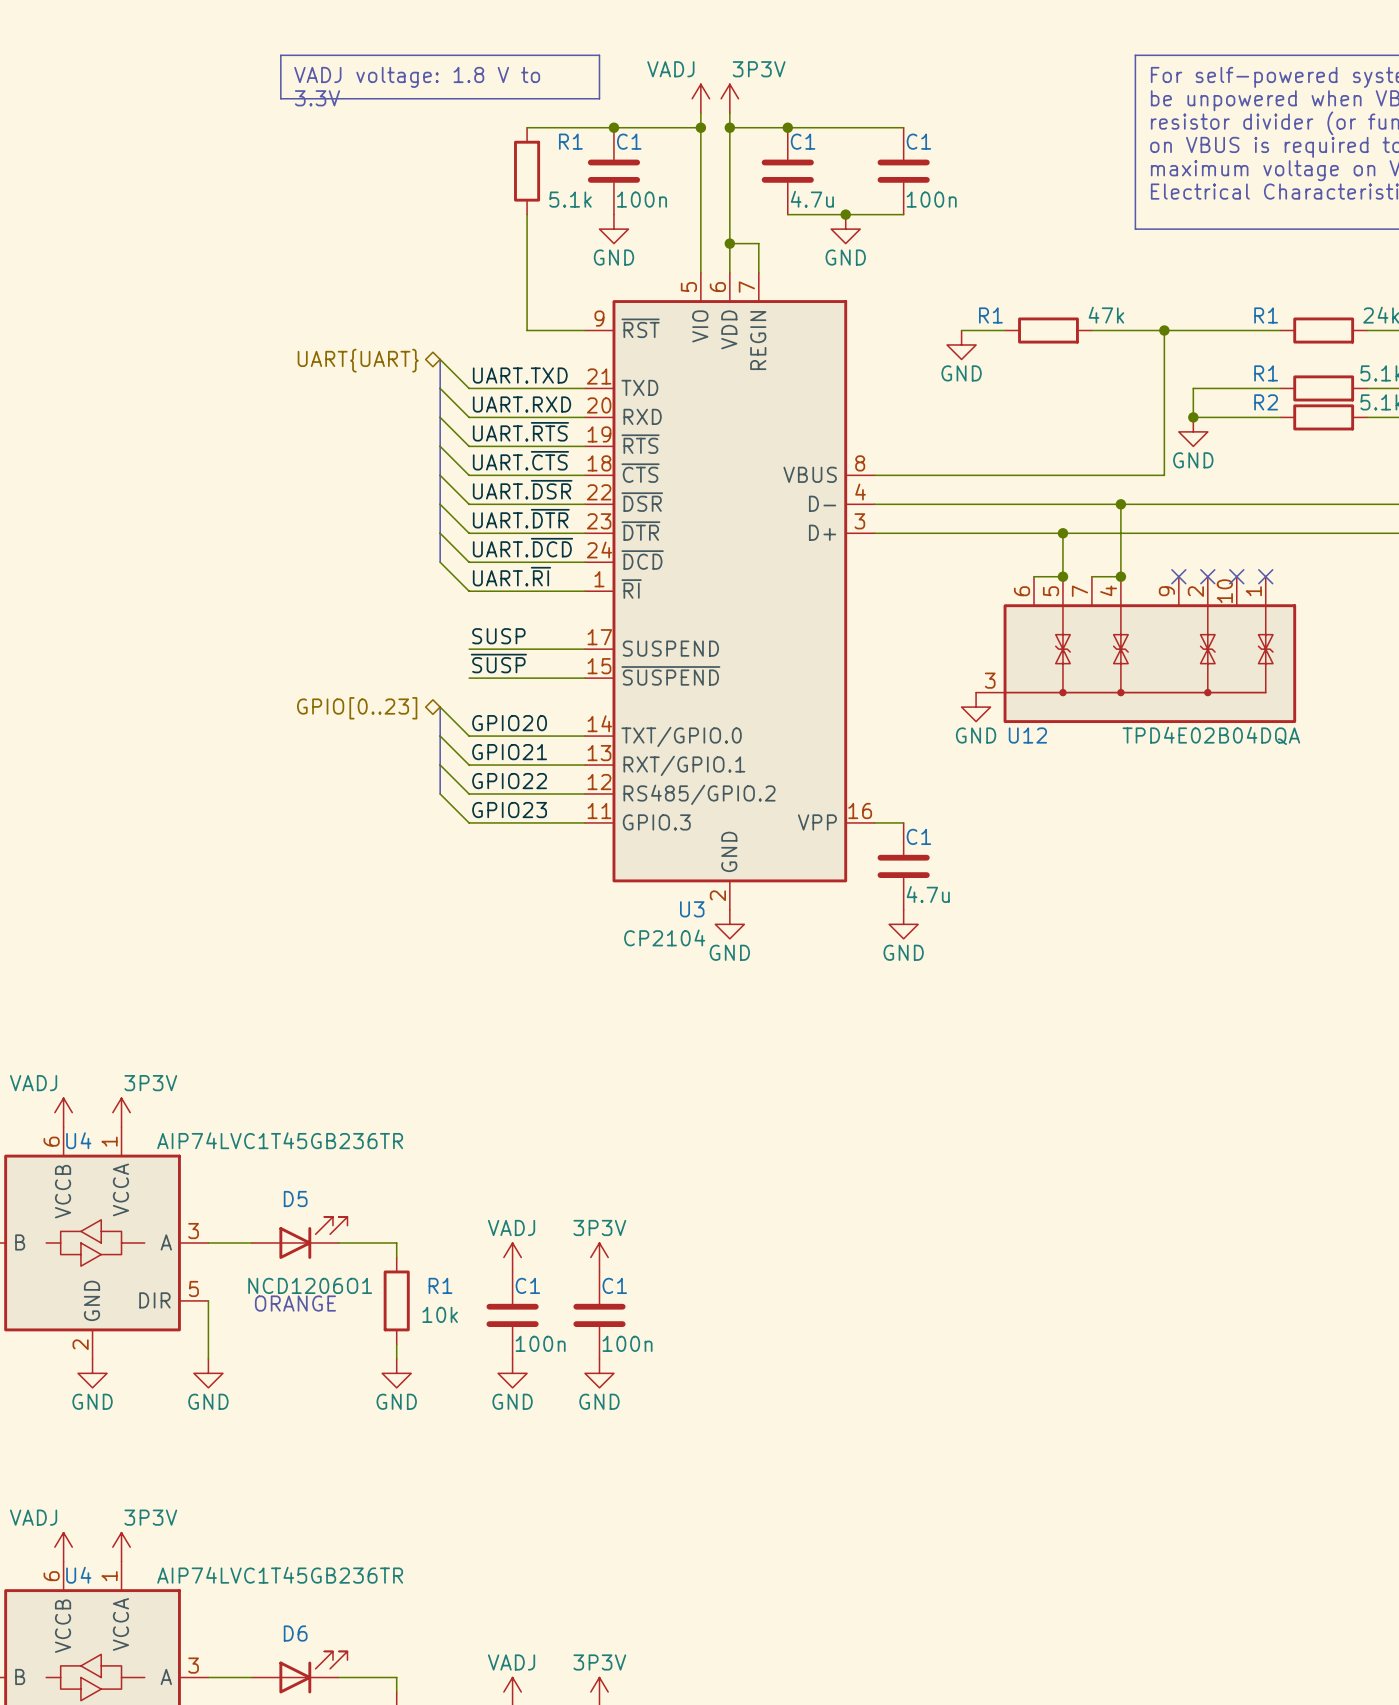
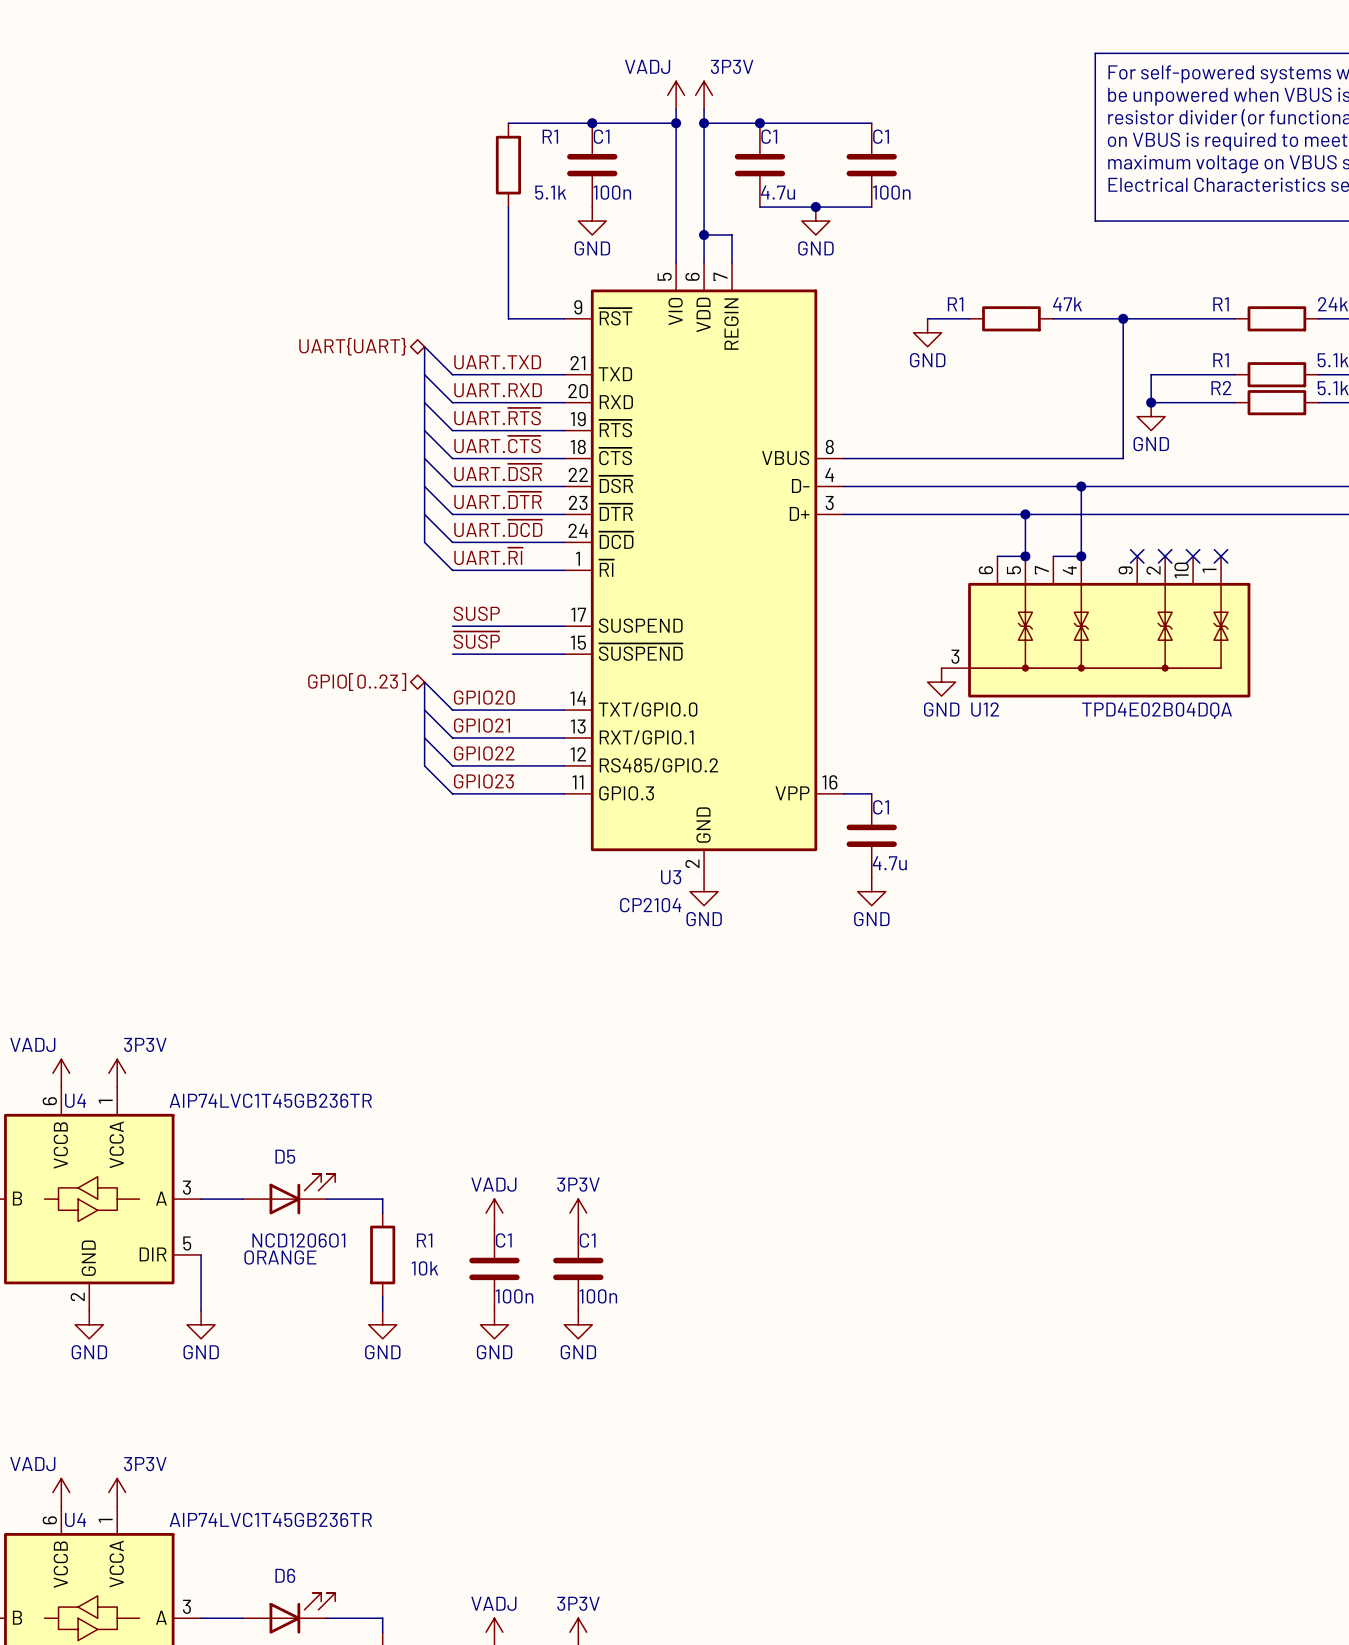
line: (280, 55) (599, 55) (599, 98) (280, 98) (280, 55) -> none
text: VADJ voltage: 1.8 V to (417, 77) -> none
text: 3.3V (317, 98) -> none

